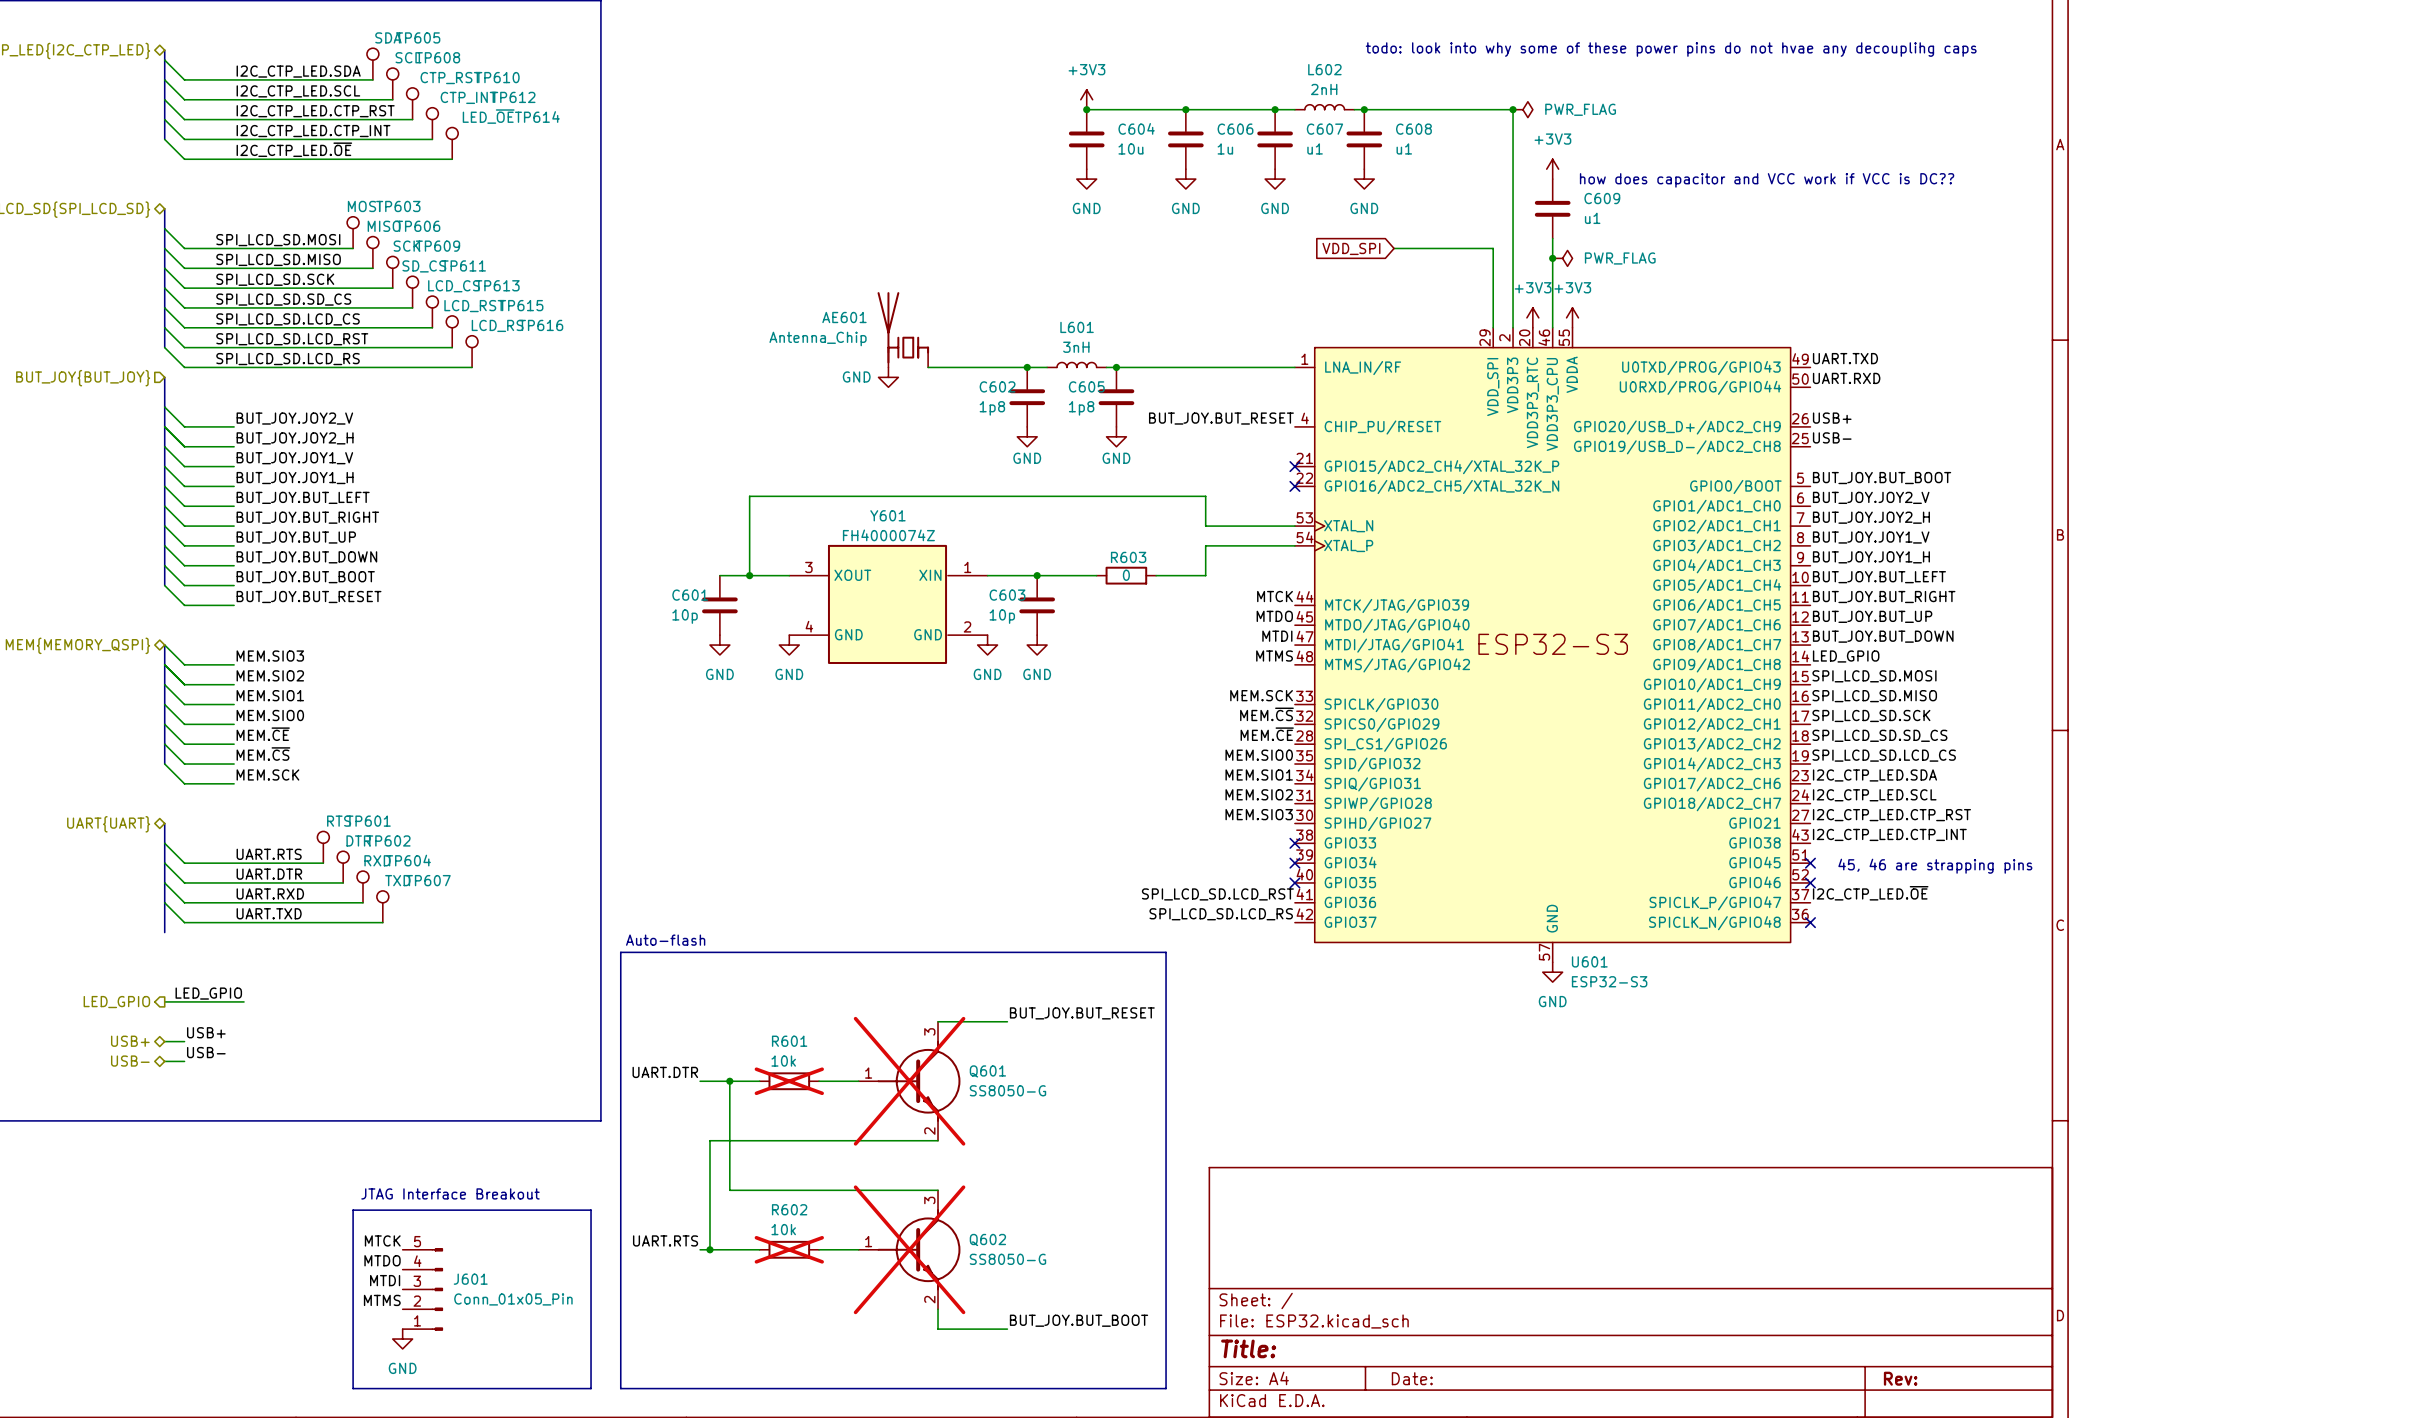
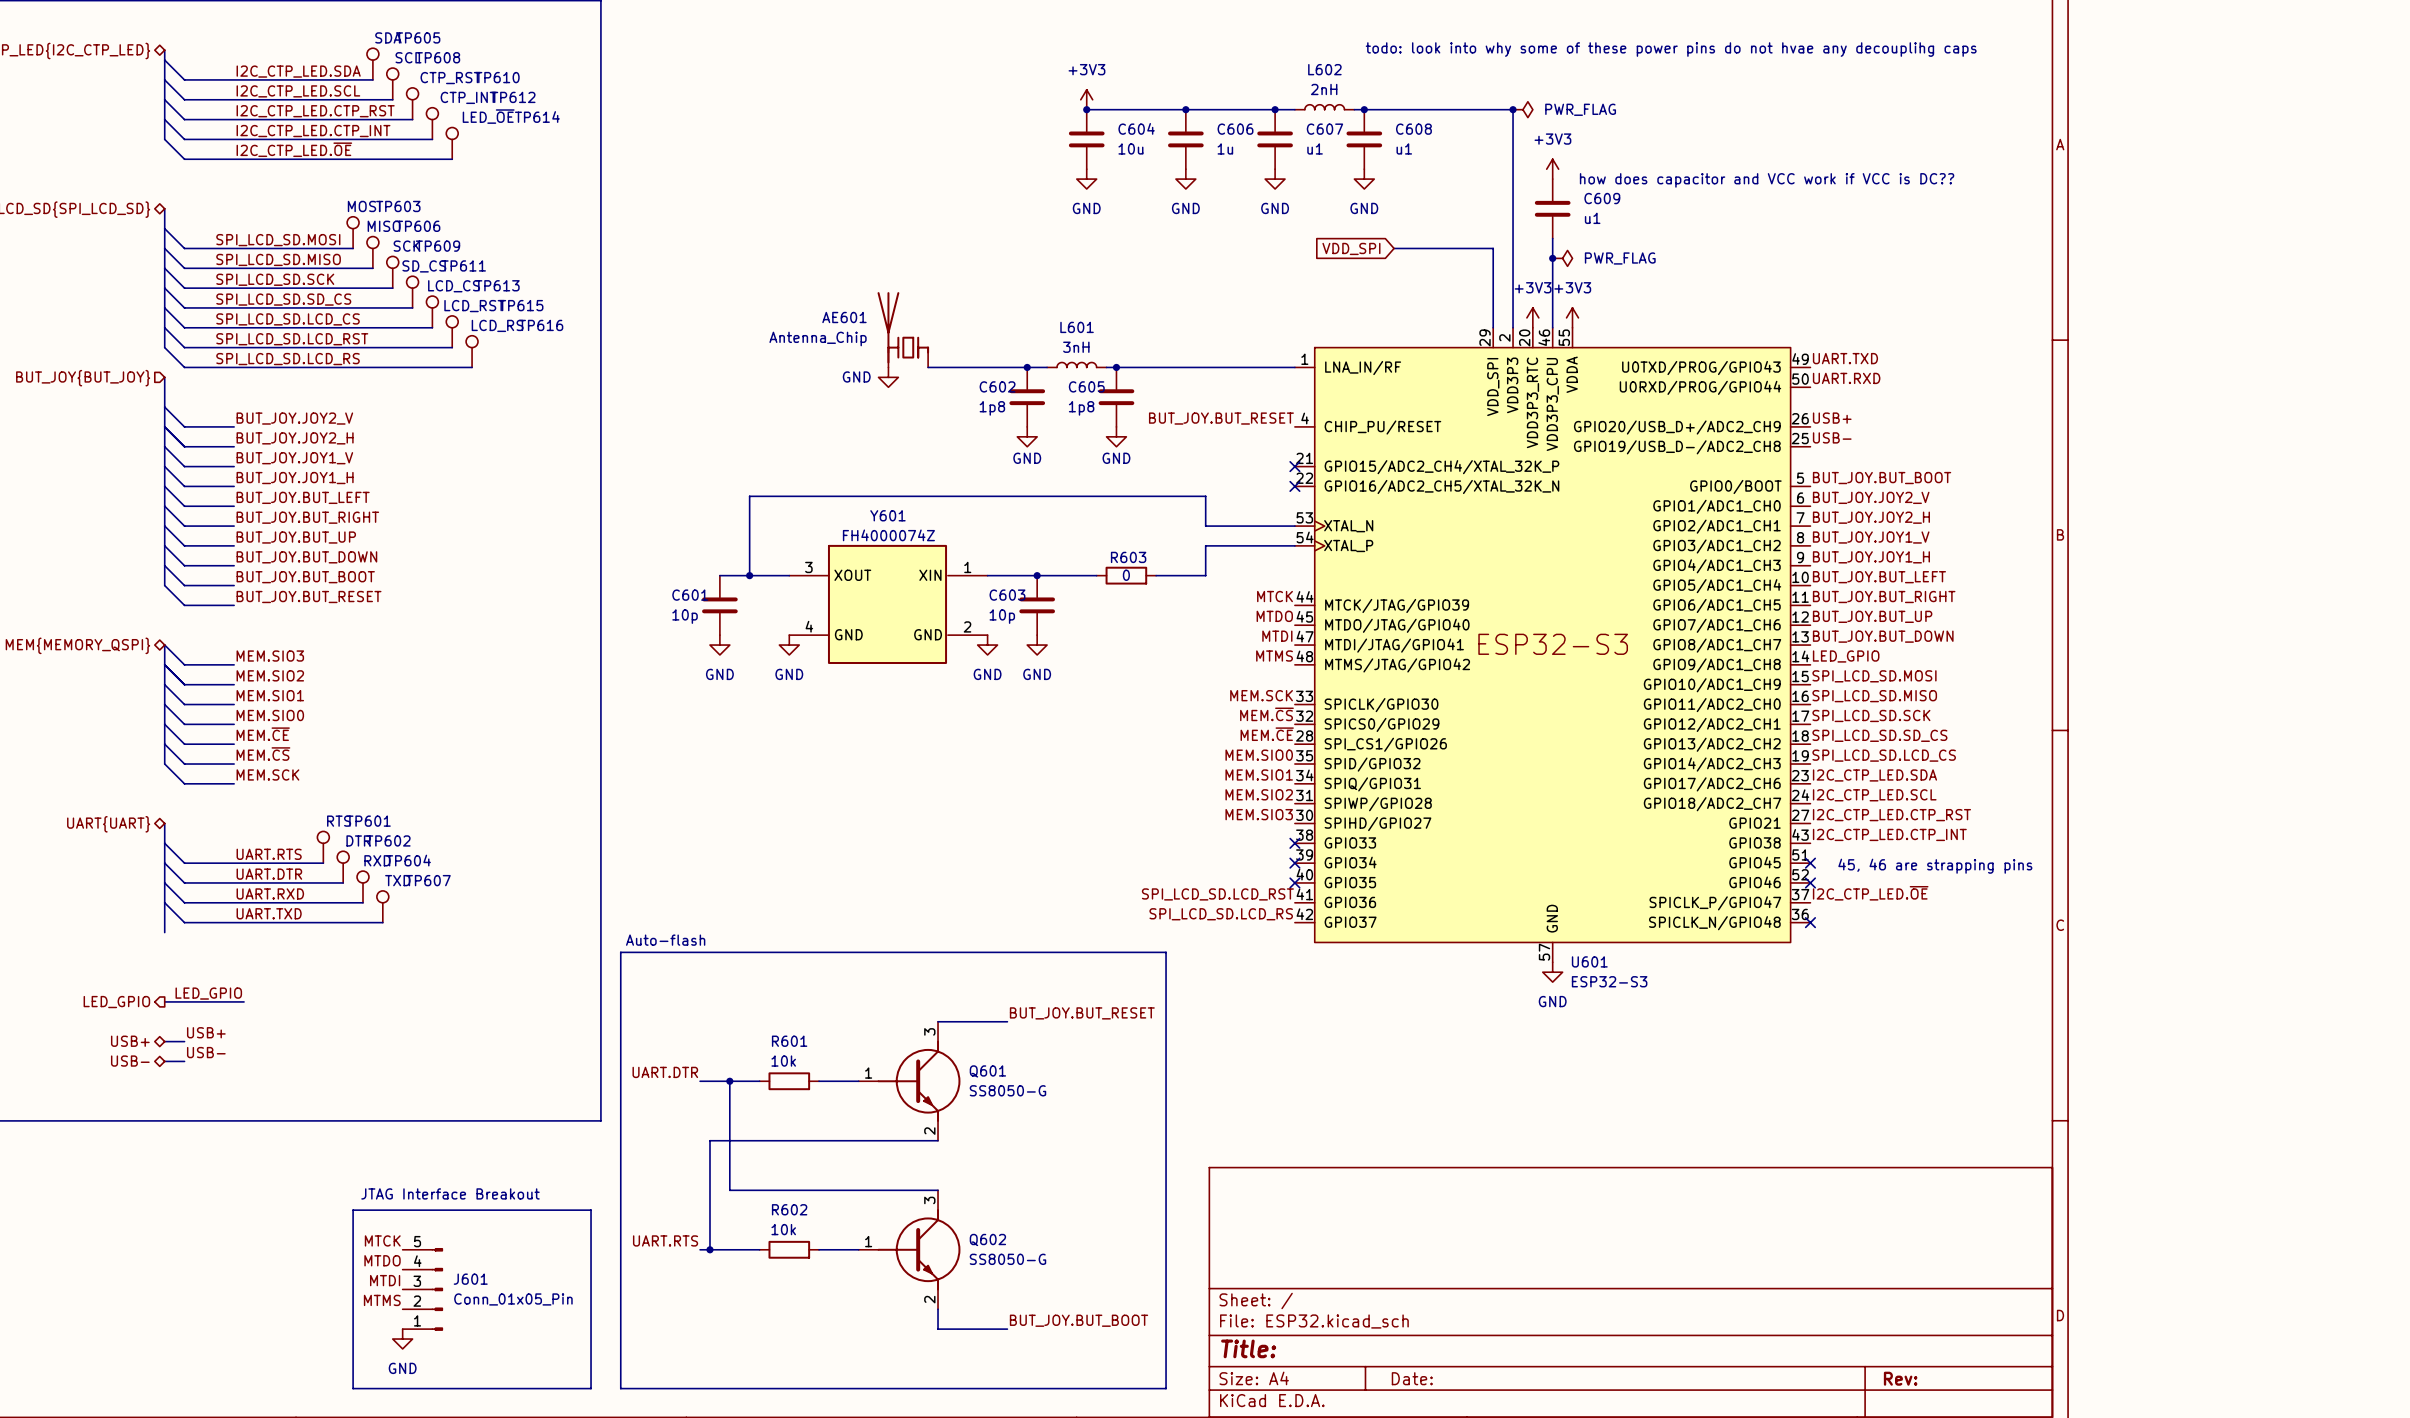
R601 do-not-place cross: (789, 1081) -> none
Q601 do-not-place cross: (909, 1081) -> none
R602 do-not-place cross: (789, 1249) -> none
Q602 do-not-place cross: (909, 1249) -> none

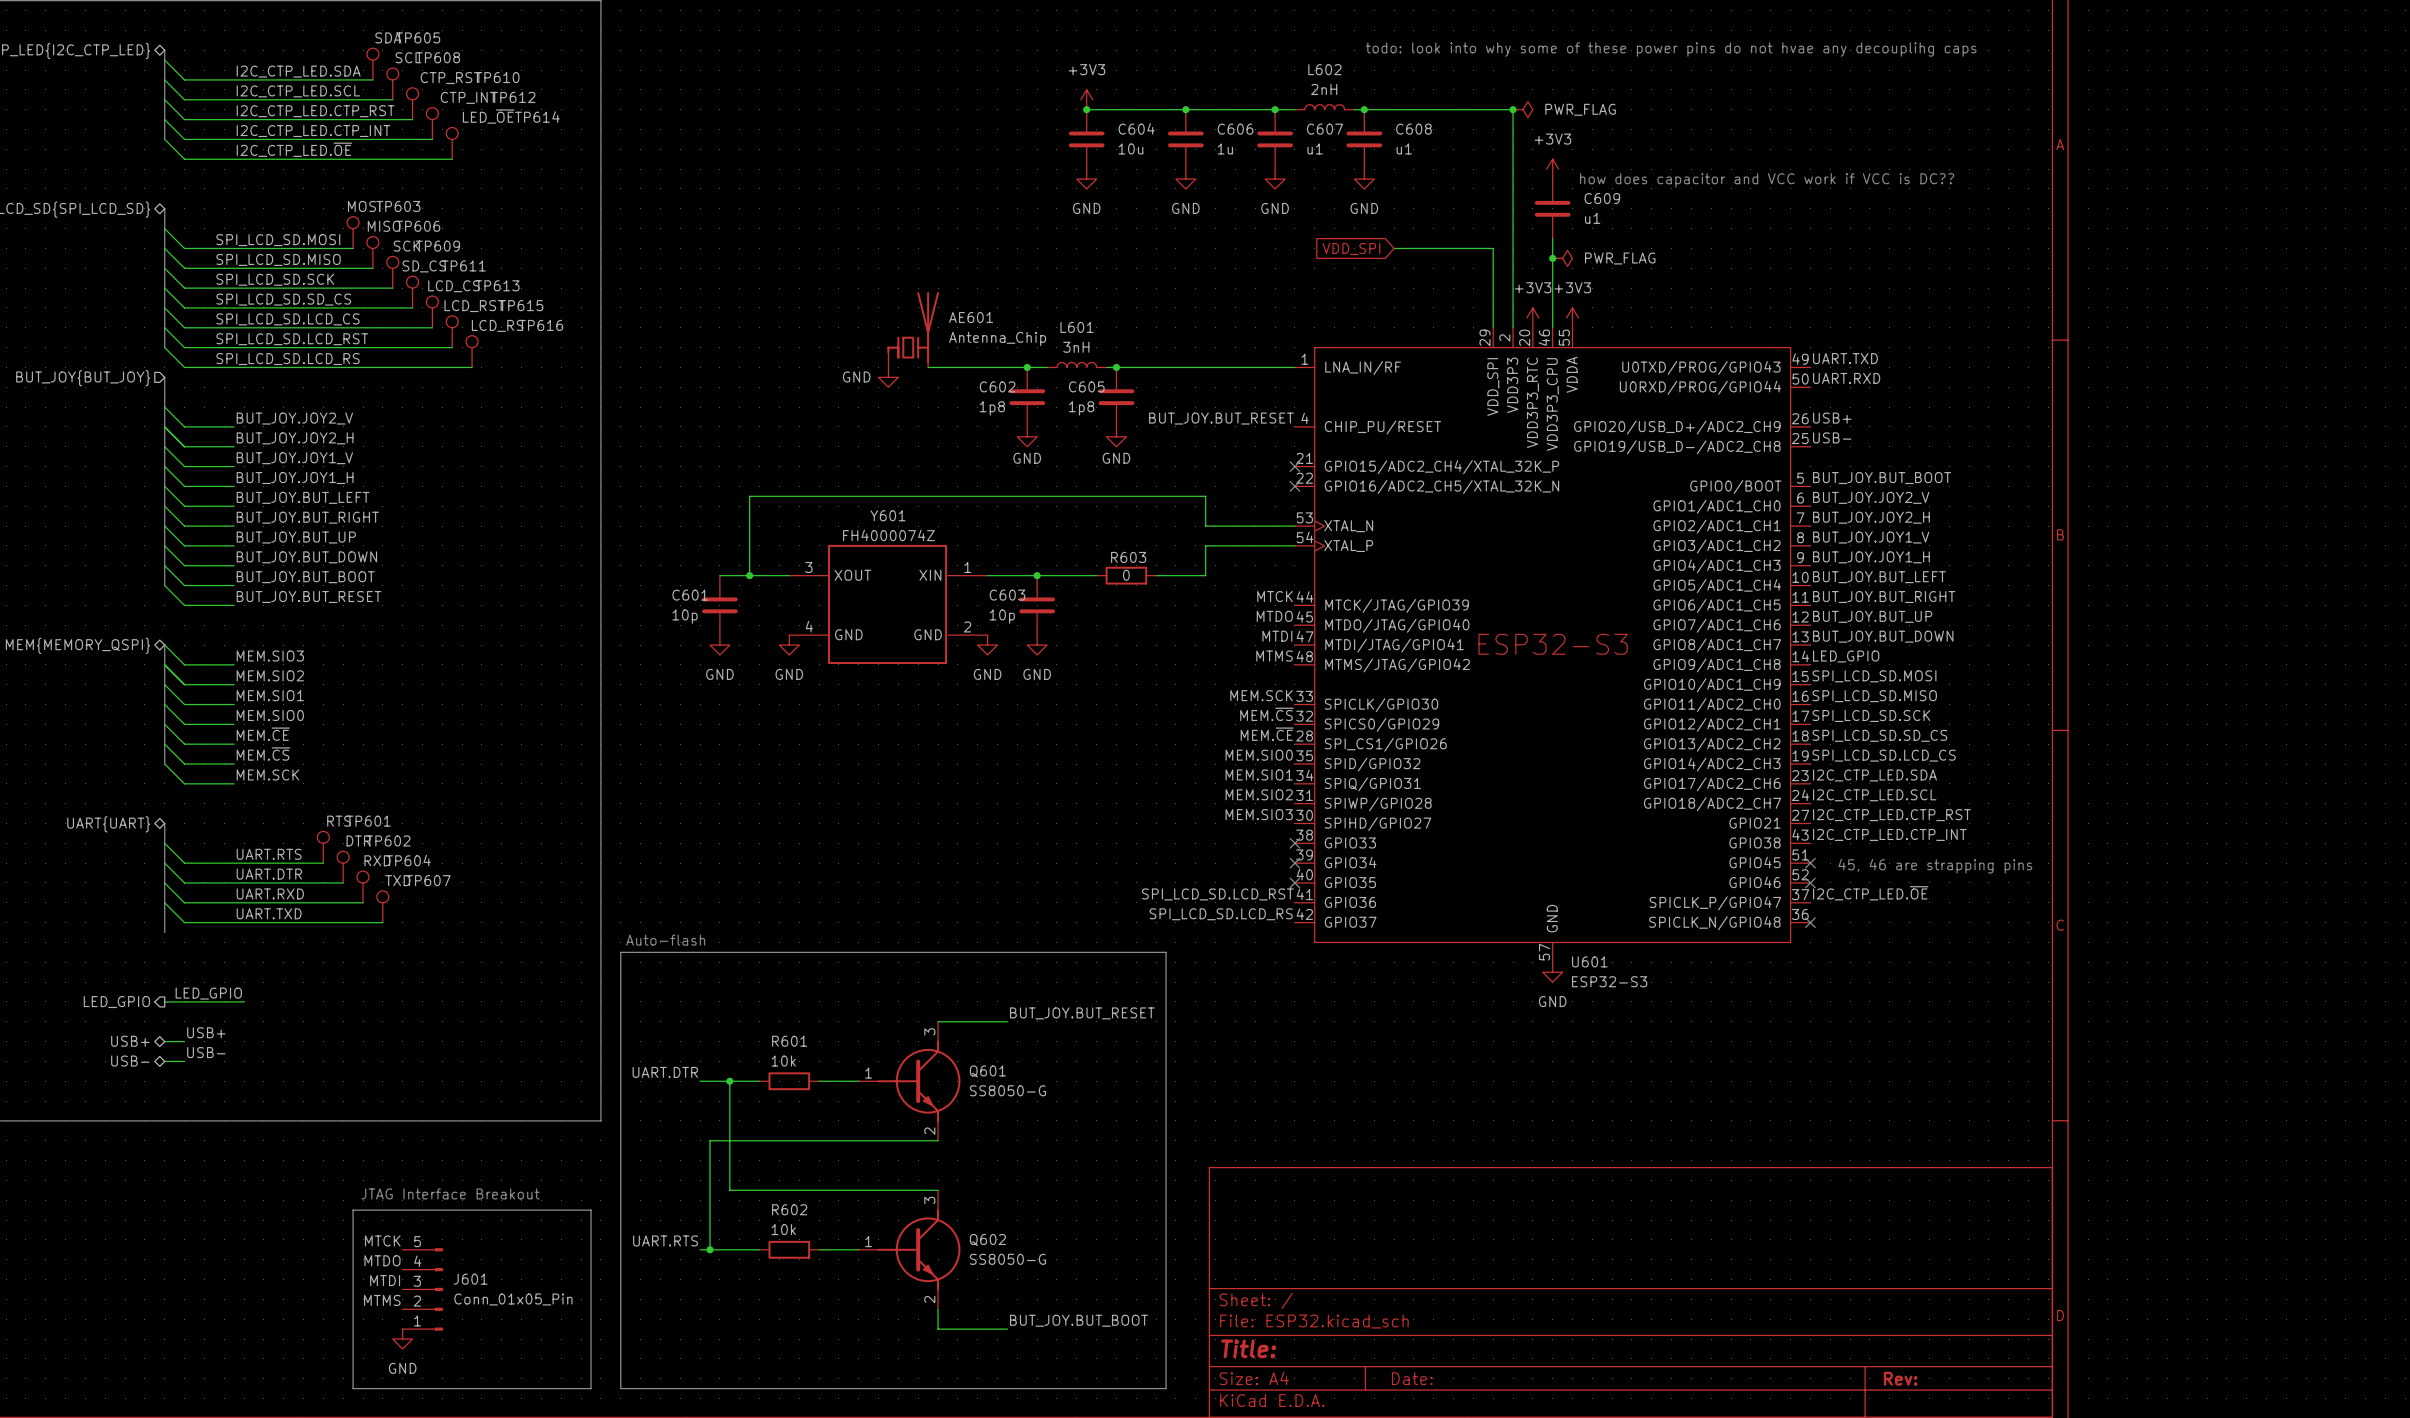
AE601 flip: as is (903, 327) -> left-right (913, 327)

